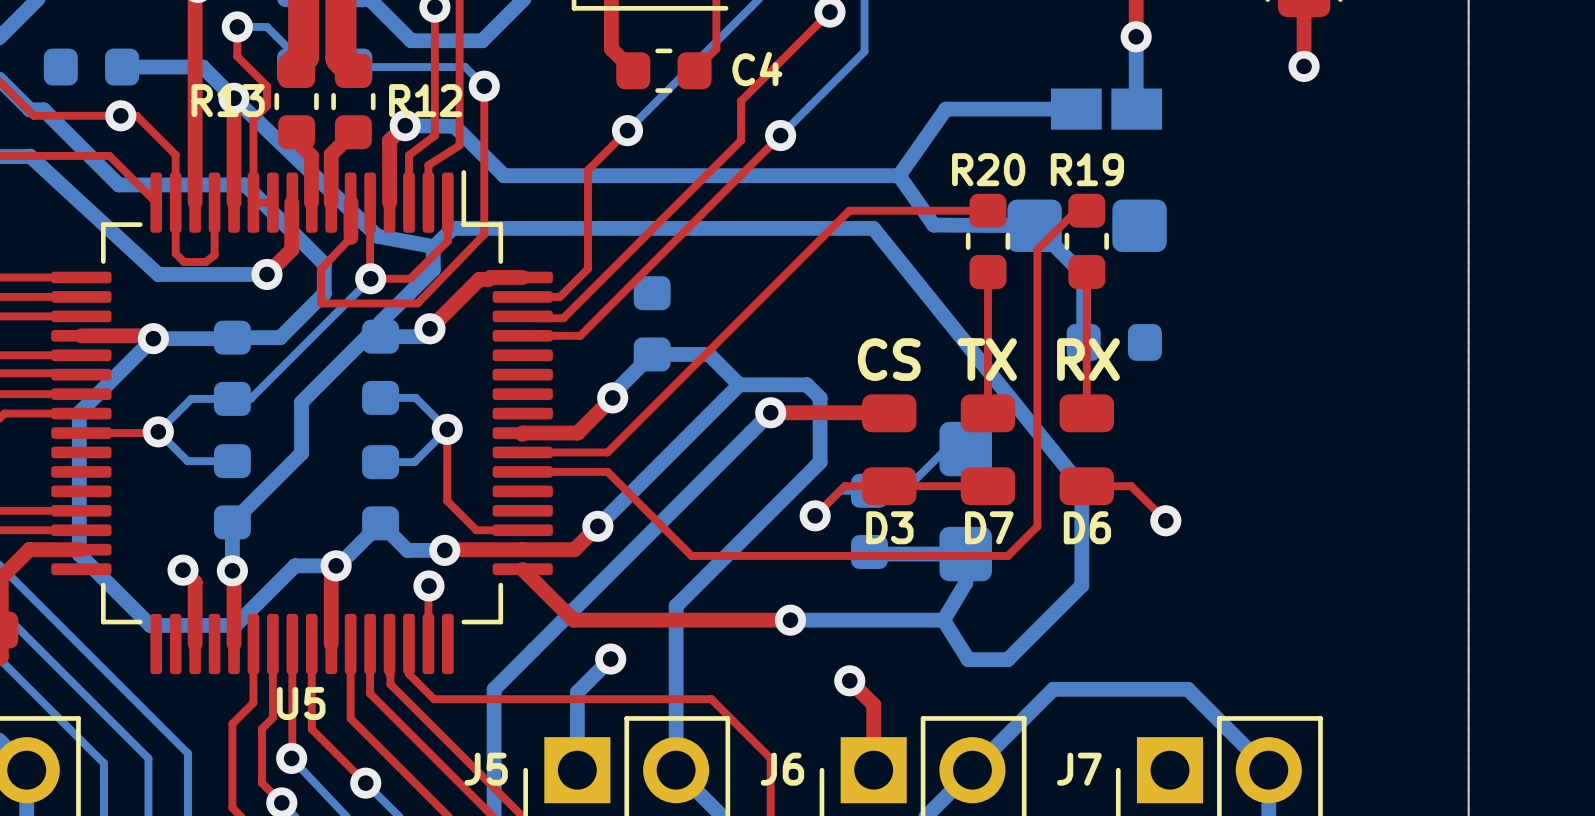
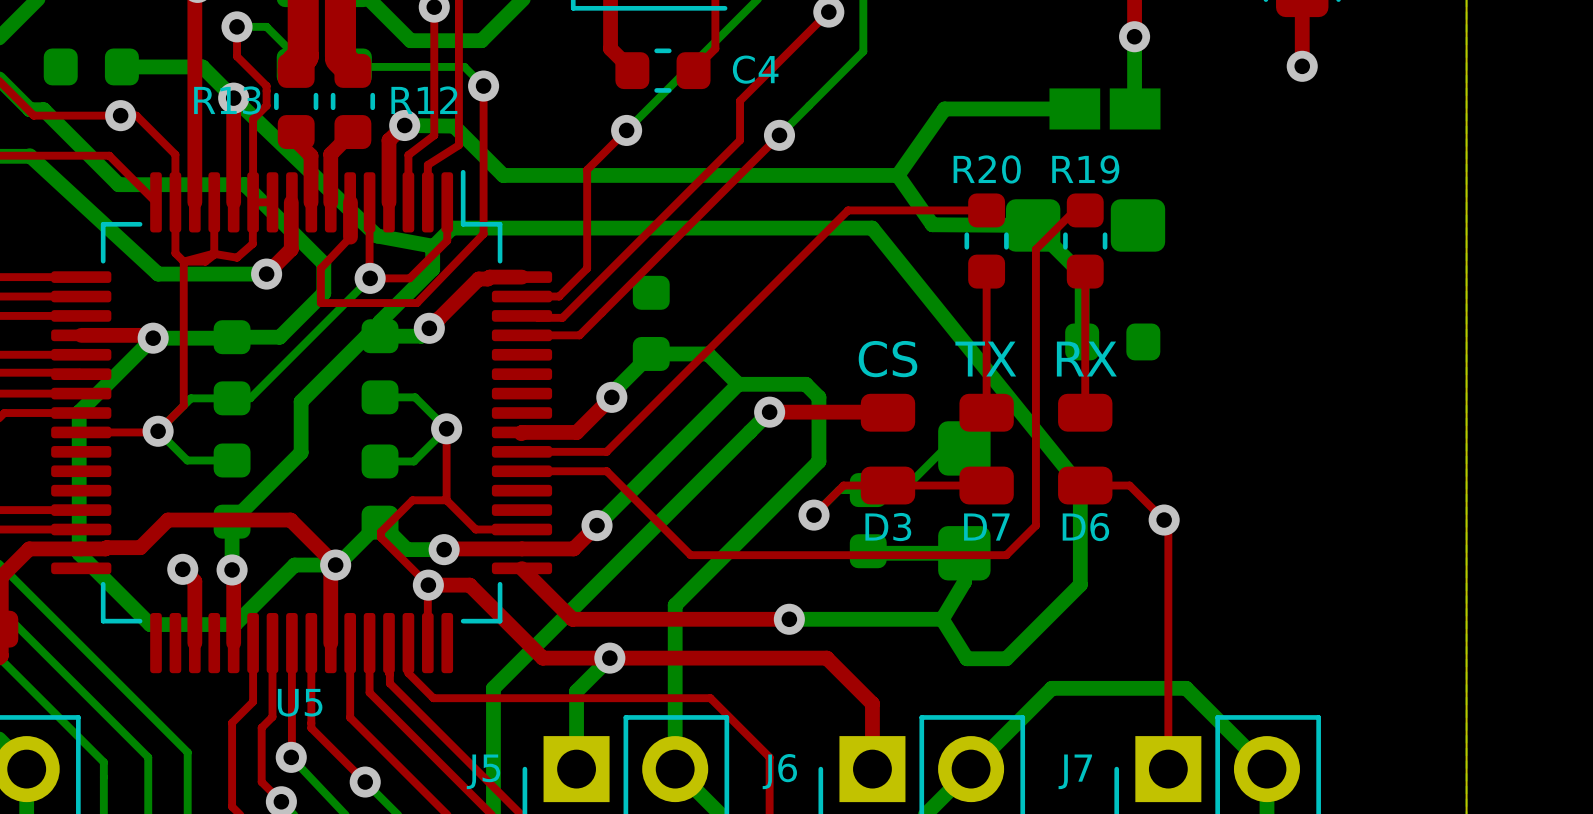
top track: none -> (253, 202) (252, 243) (237, 257) (213, 253) (183, 261) (183, 405) (158, 431)
top track: none -> (446, 500) (412, 500) (381, 531) (381, 537) (428, 585) (469, 585) (542, 658) (826, 658) (848, 679)
top track: none -> (1164, 520) (1168, 524) (1168, 769)
top track: none -> (81, 548) (140, 547) (167, 520) (290, 520) (335, 565)
via: (849, 680) -> none

